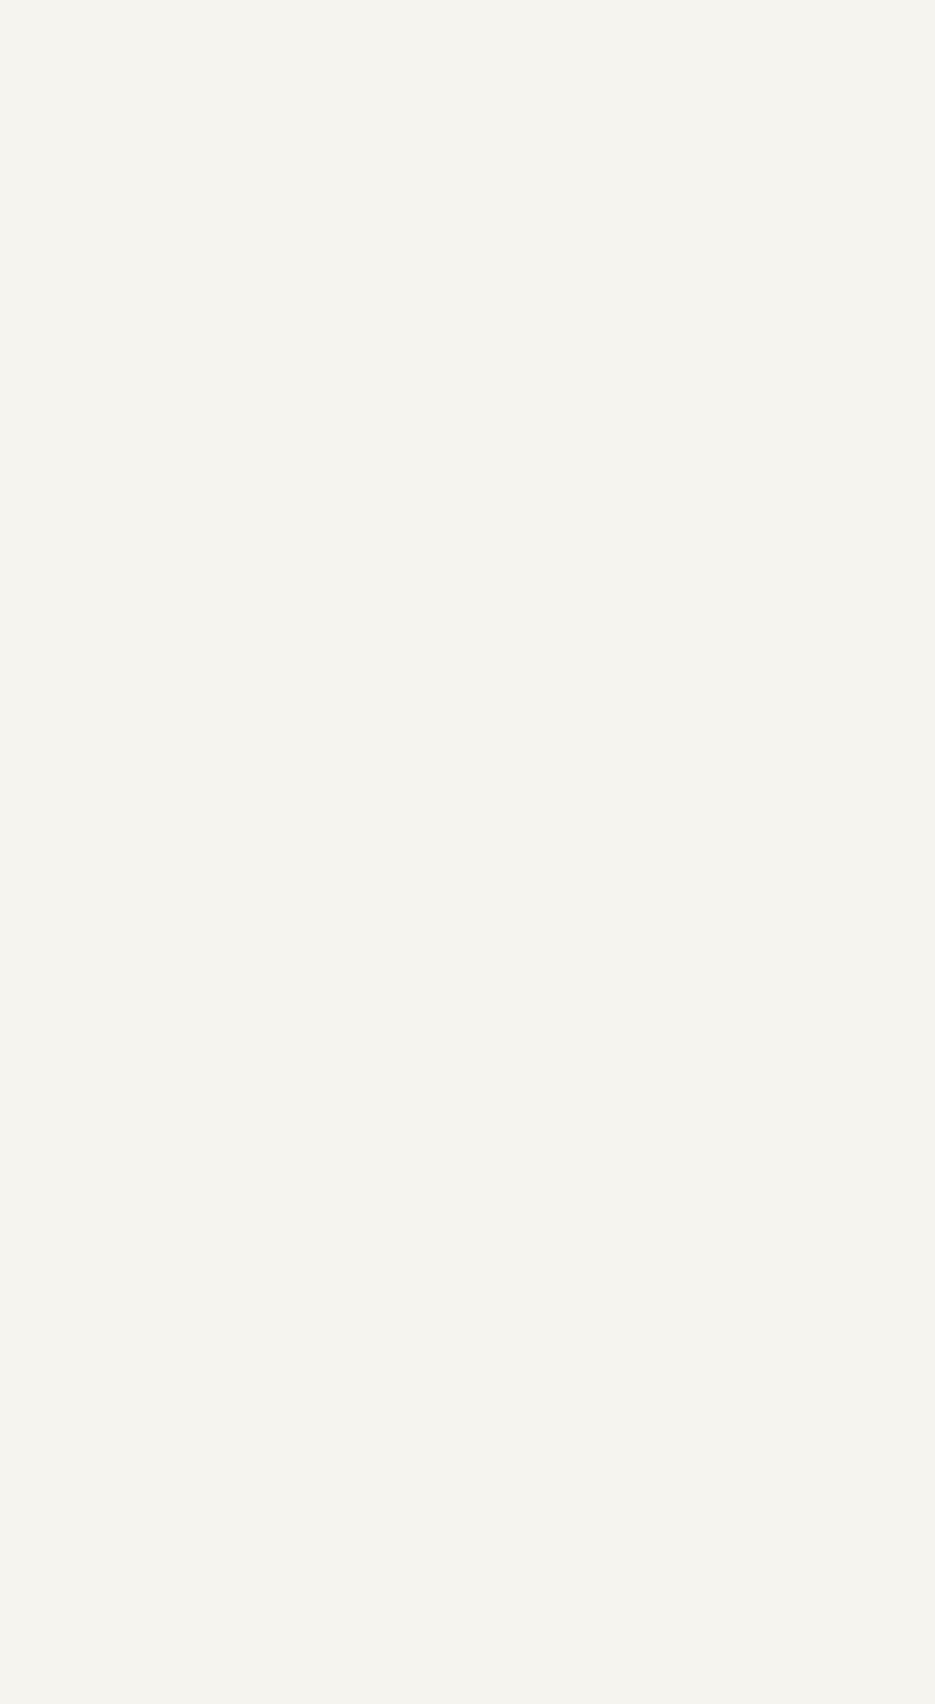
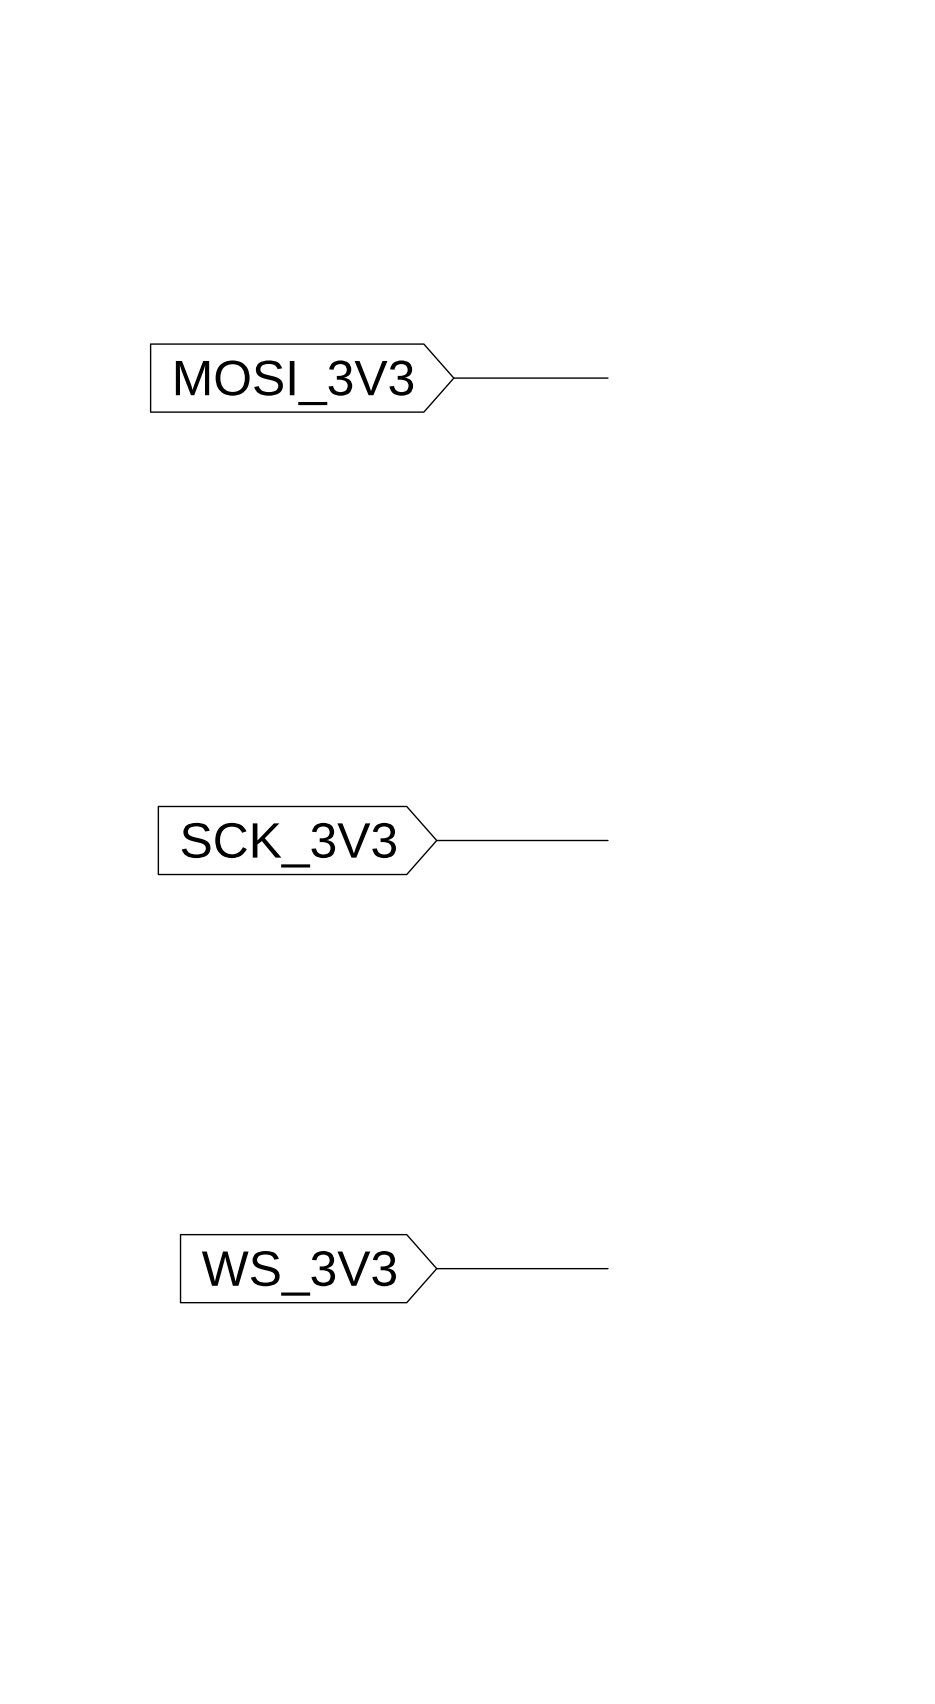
global label: none -> MOSI_3V3 (294, 382)
wire: none -> (453, 378) (607, 378)
global label: none -> SCK_3V3 (288, 845)
wire: none -> (436, 840) (607, 840)
global label: none -> WS_3V3 (298, 1273)
wire: none -> (436, 1268) (607, 1268)

